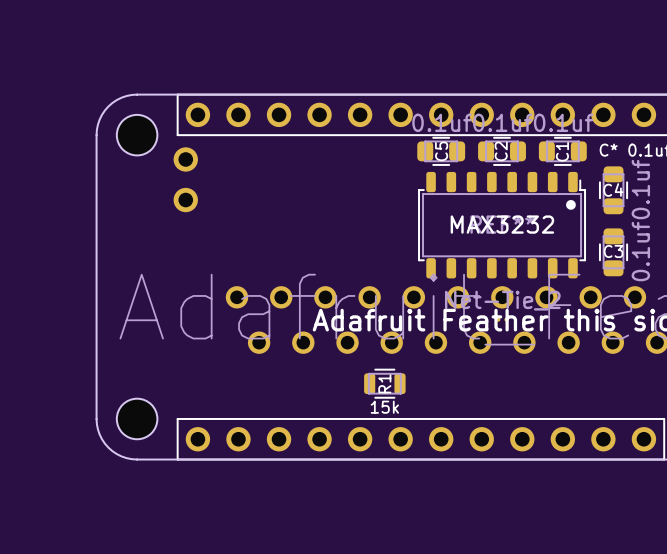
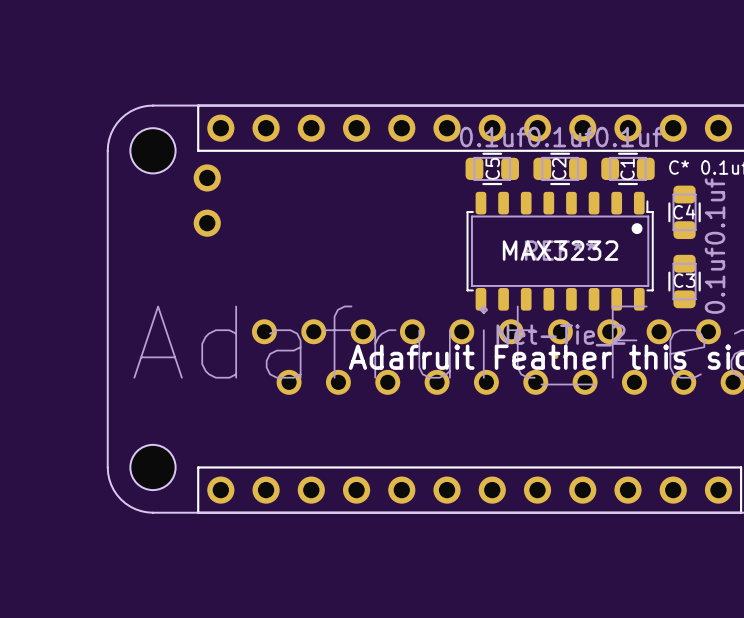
R1: 15k (384, 383) -> none

